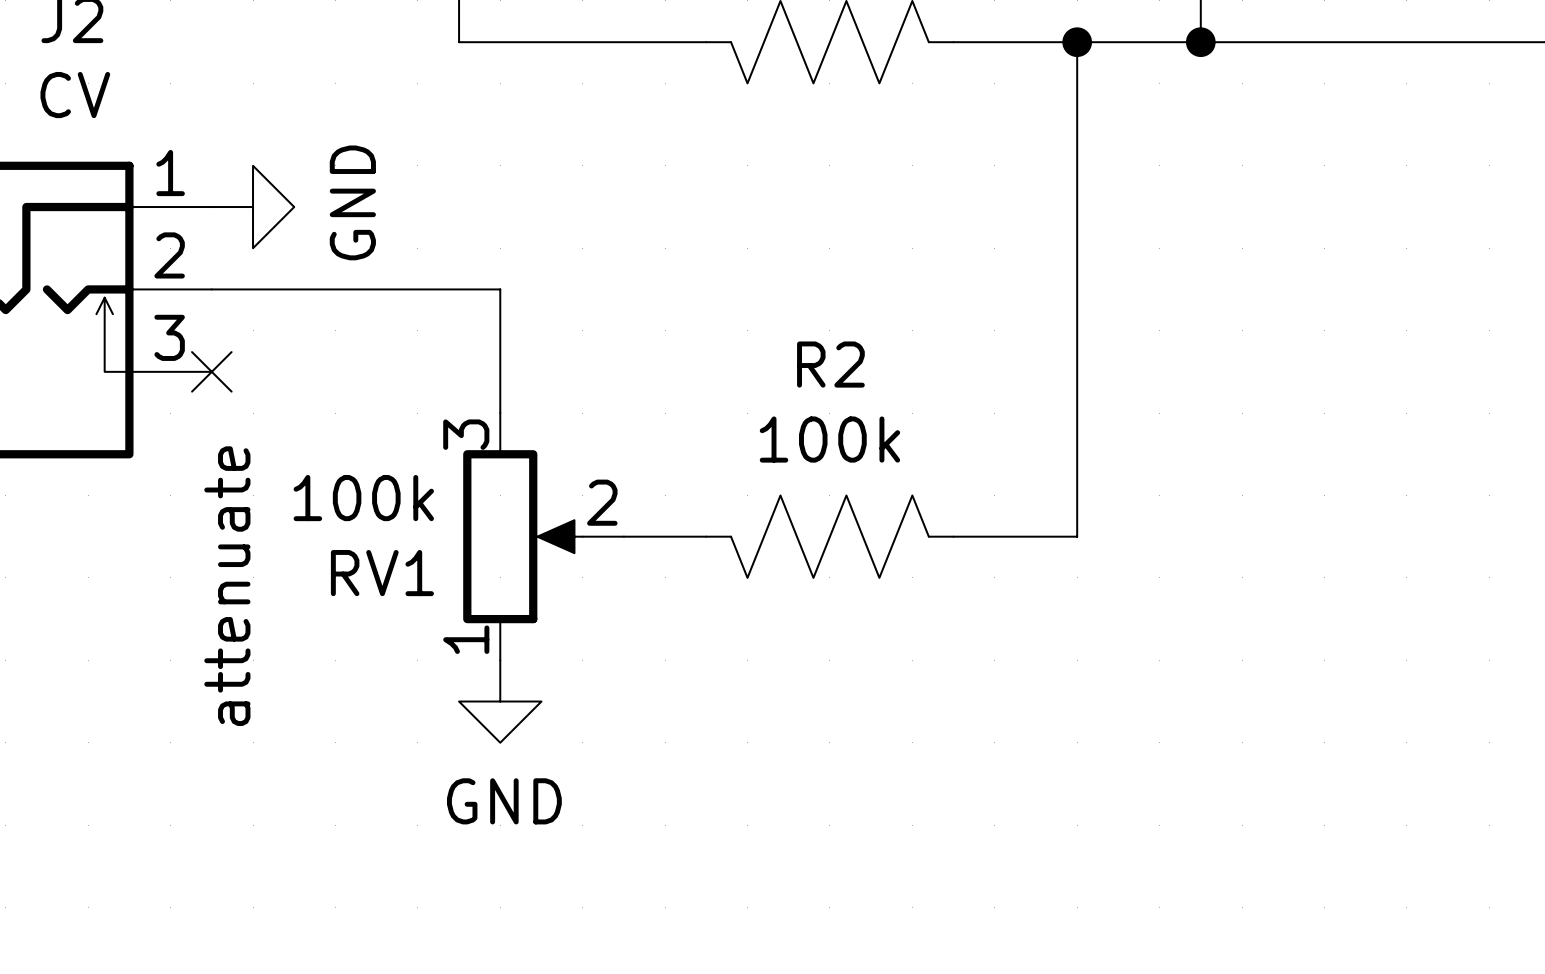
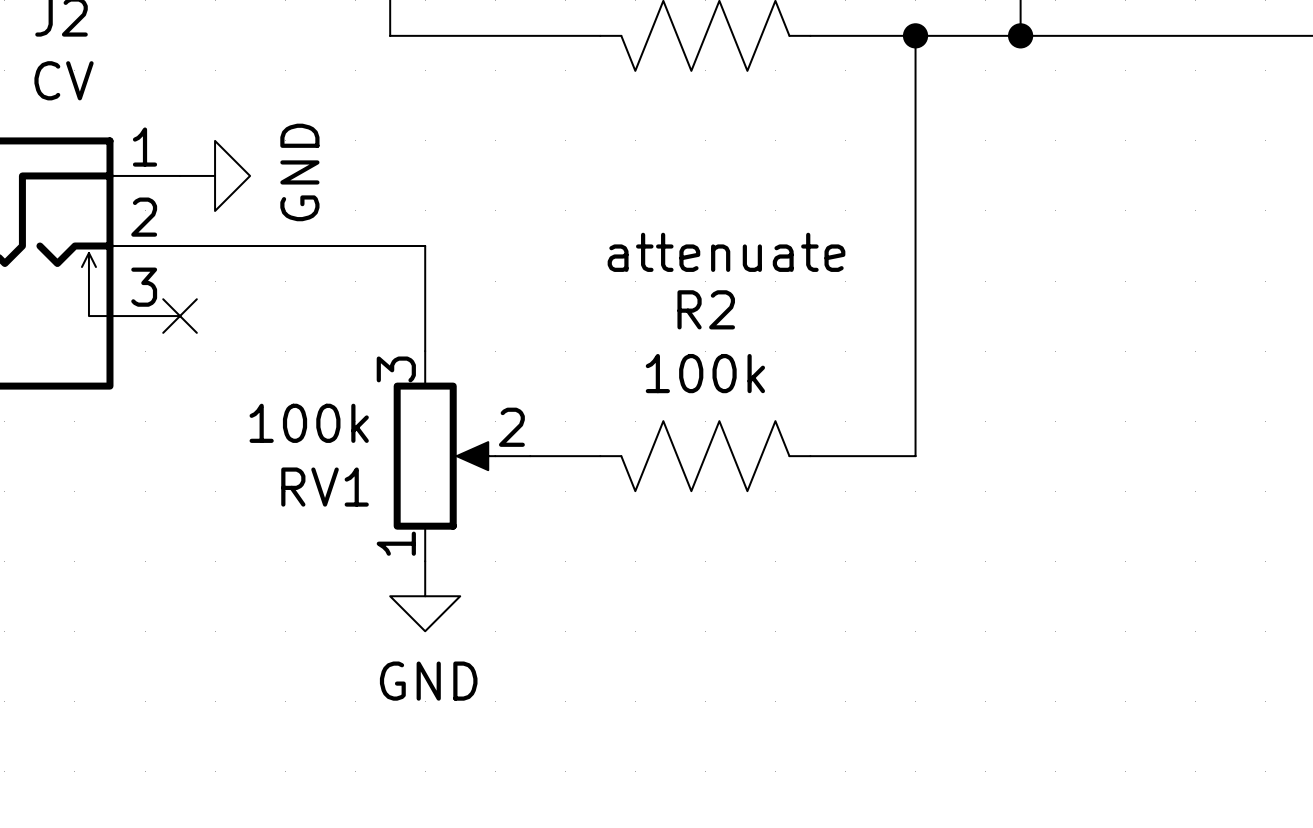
text rotation: 0° (227, 586) -> 90° clockwise (726, 252)
text position: attenuate (227, 586) -> attenuate (726, 252)

